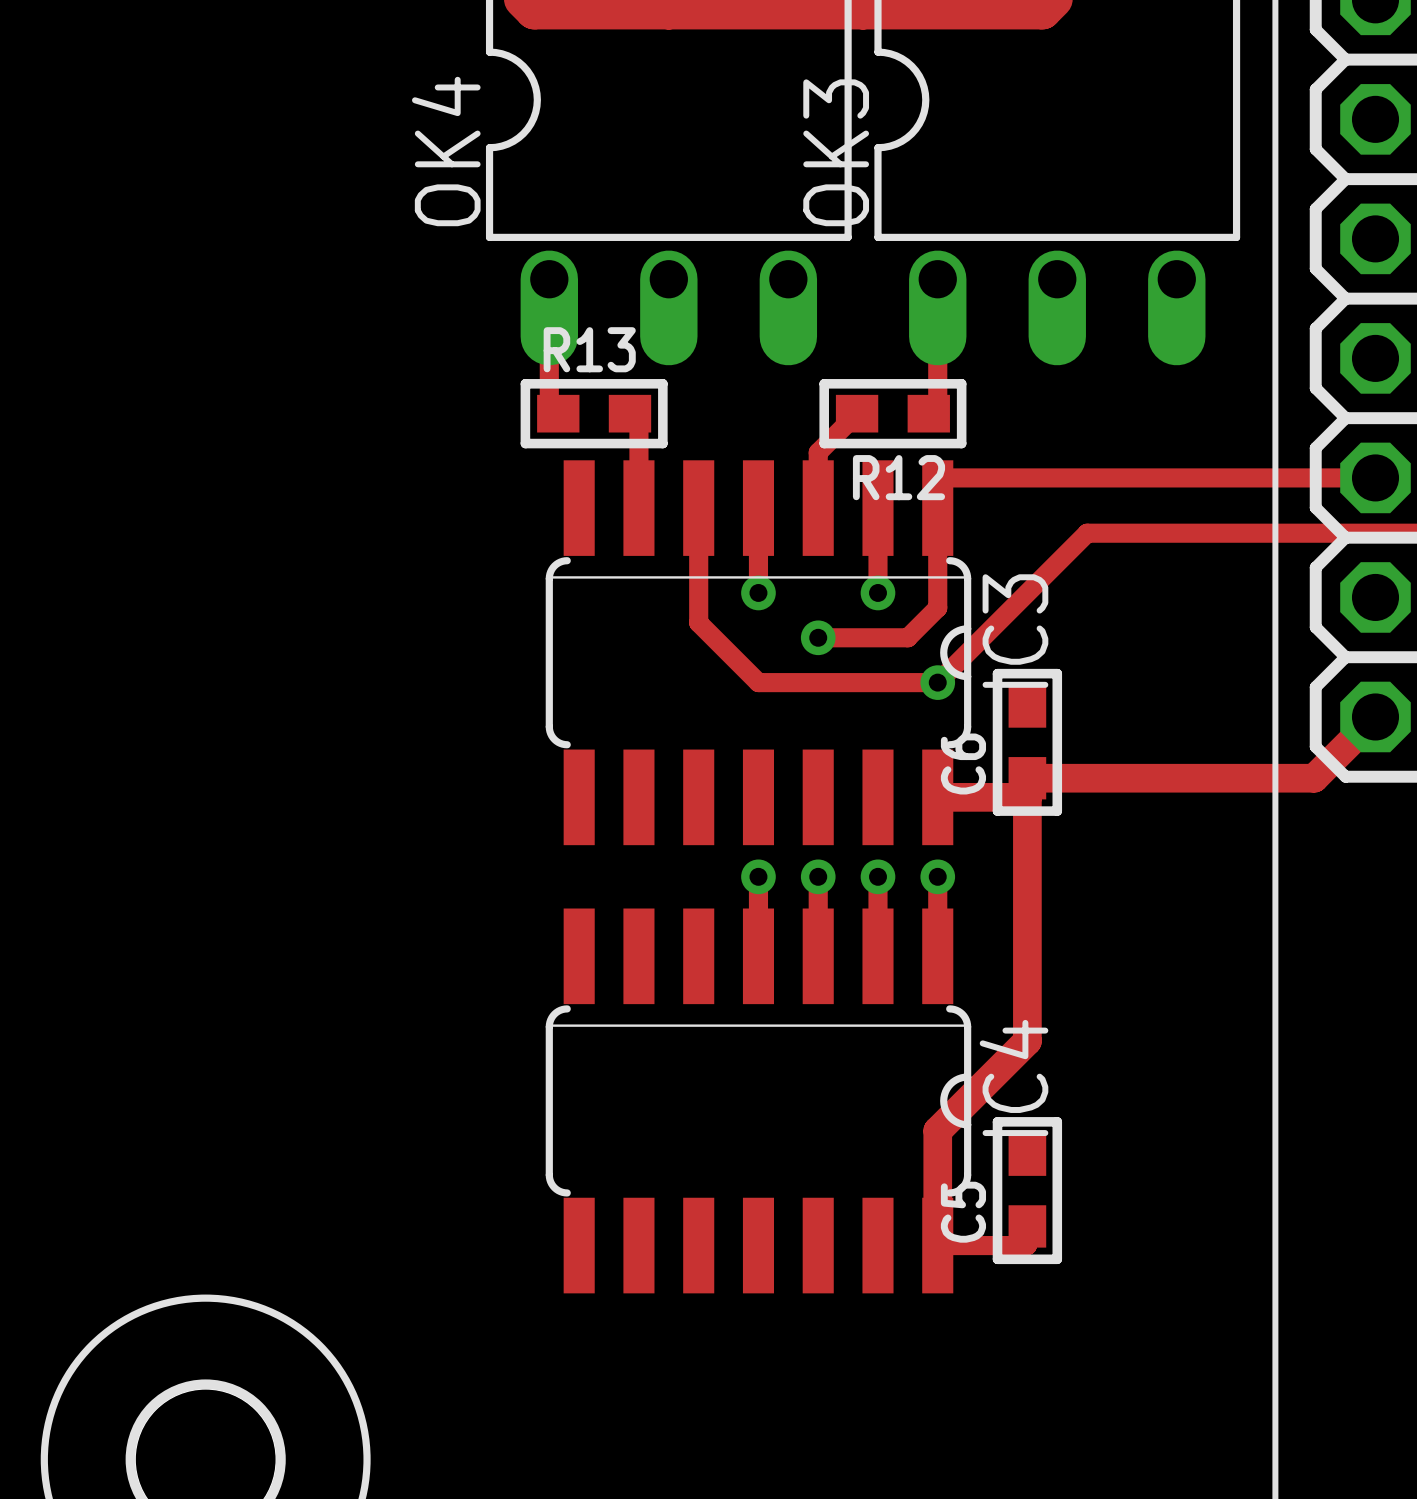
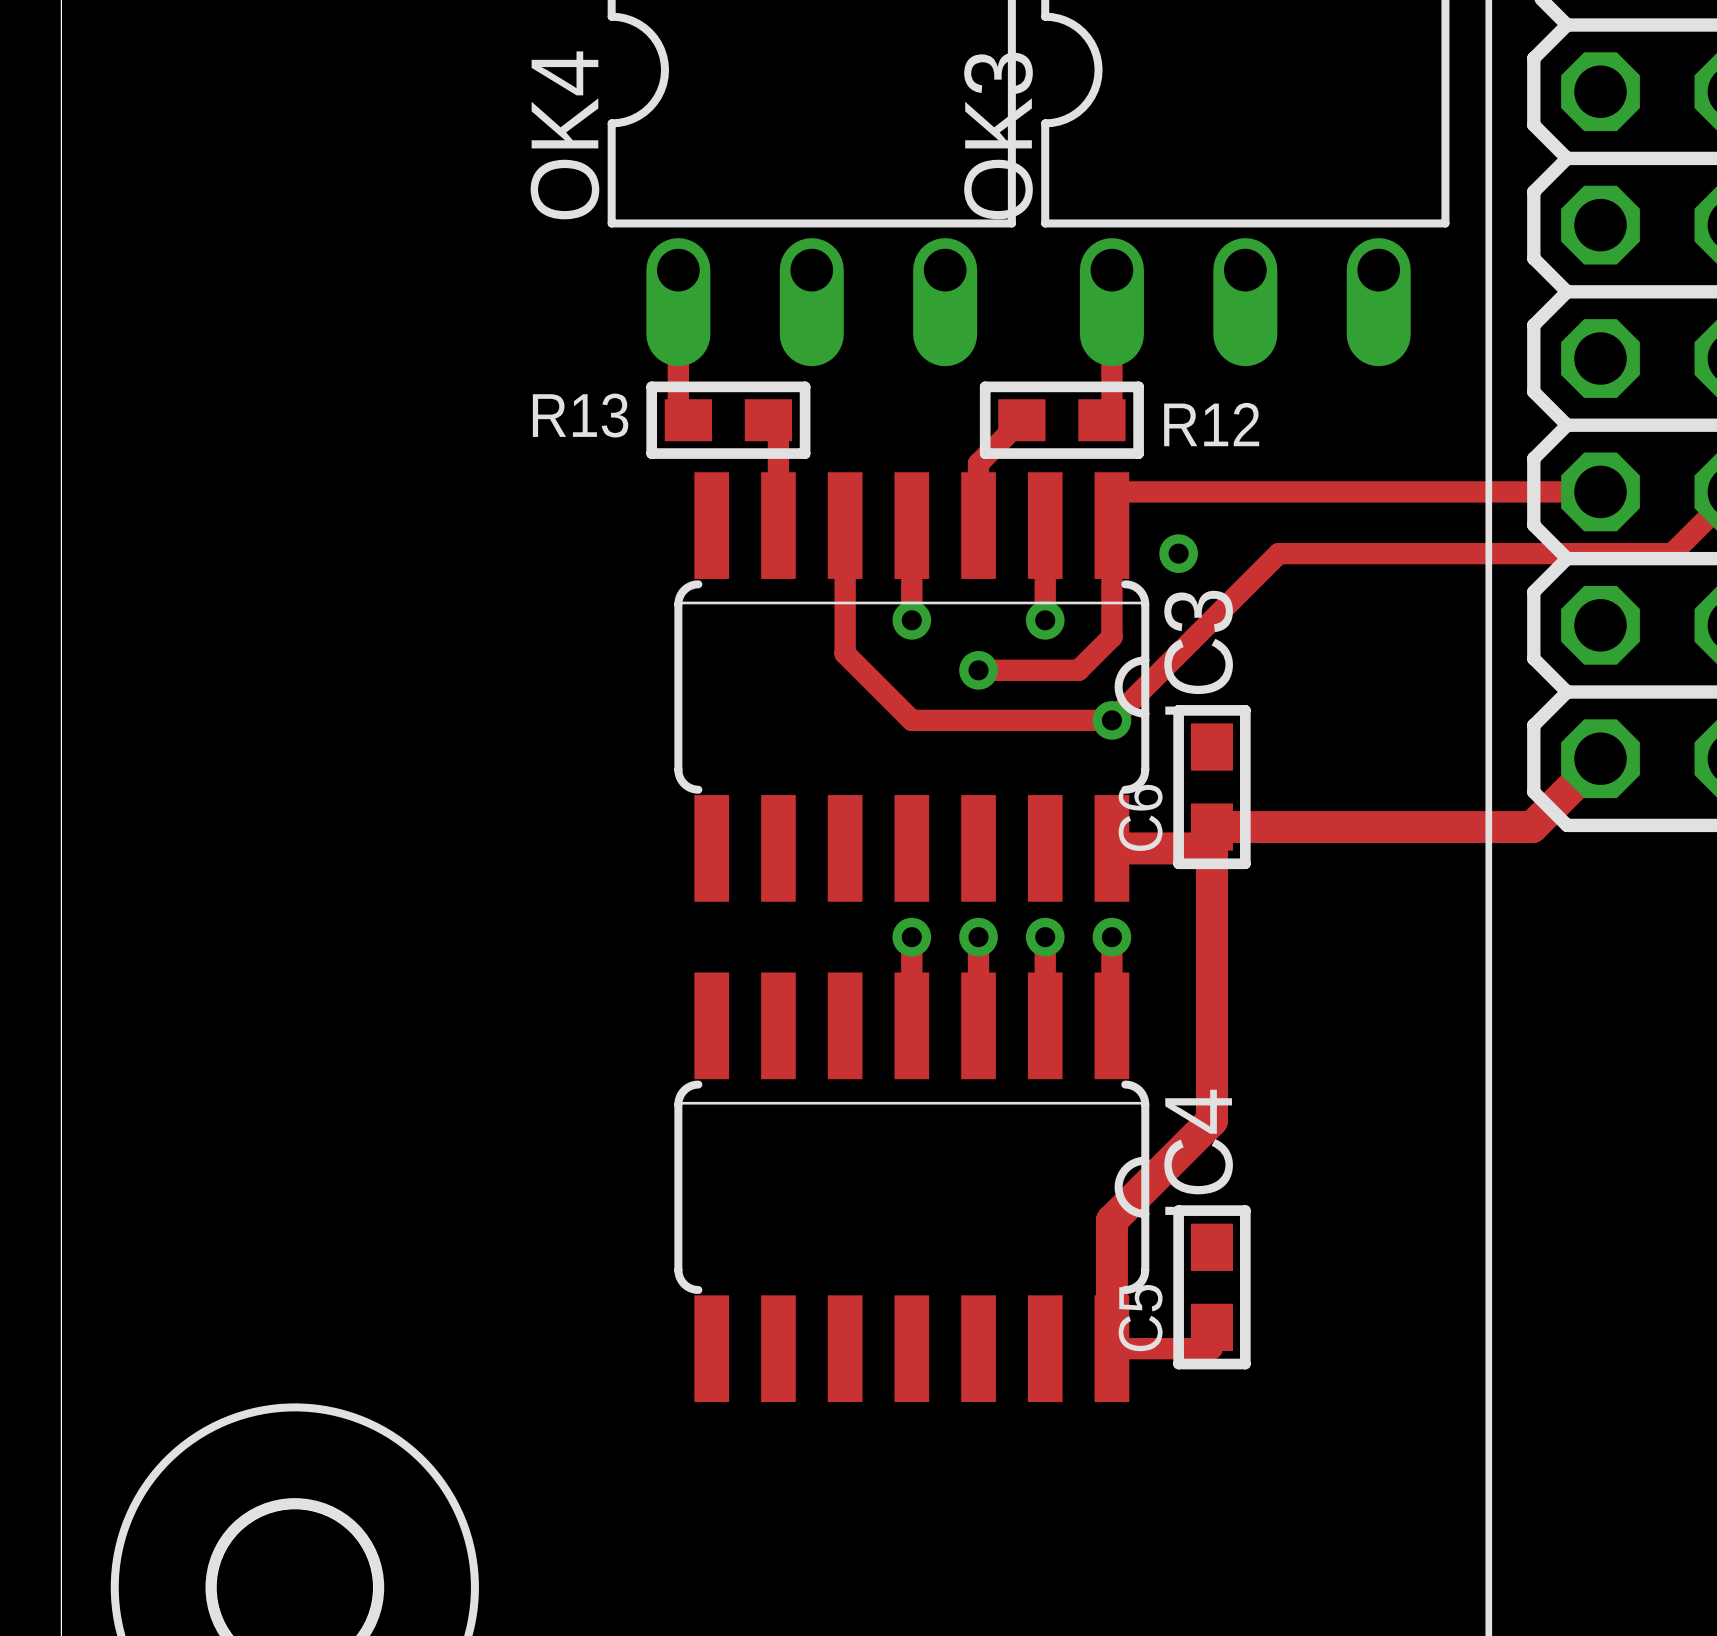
R13 name position: R13 (589, 349) -> R13 (580, 415)
R12 name position: R12 (898, 477) -> R12 (1211, 424)
via: none -> (1178, 553)

